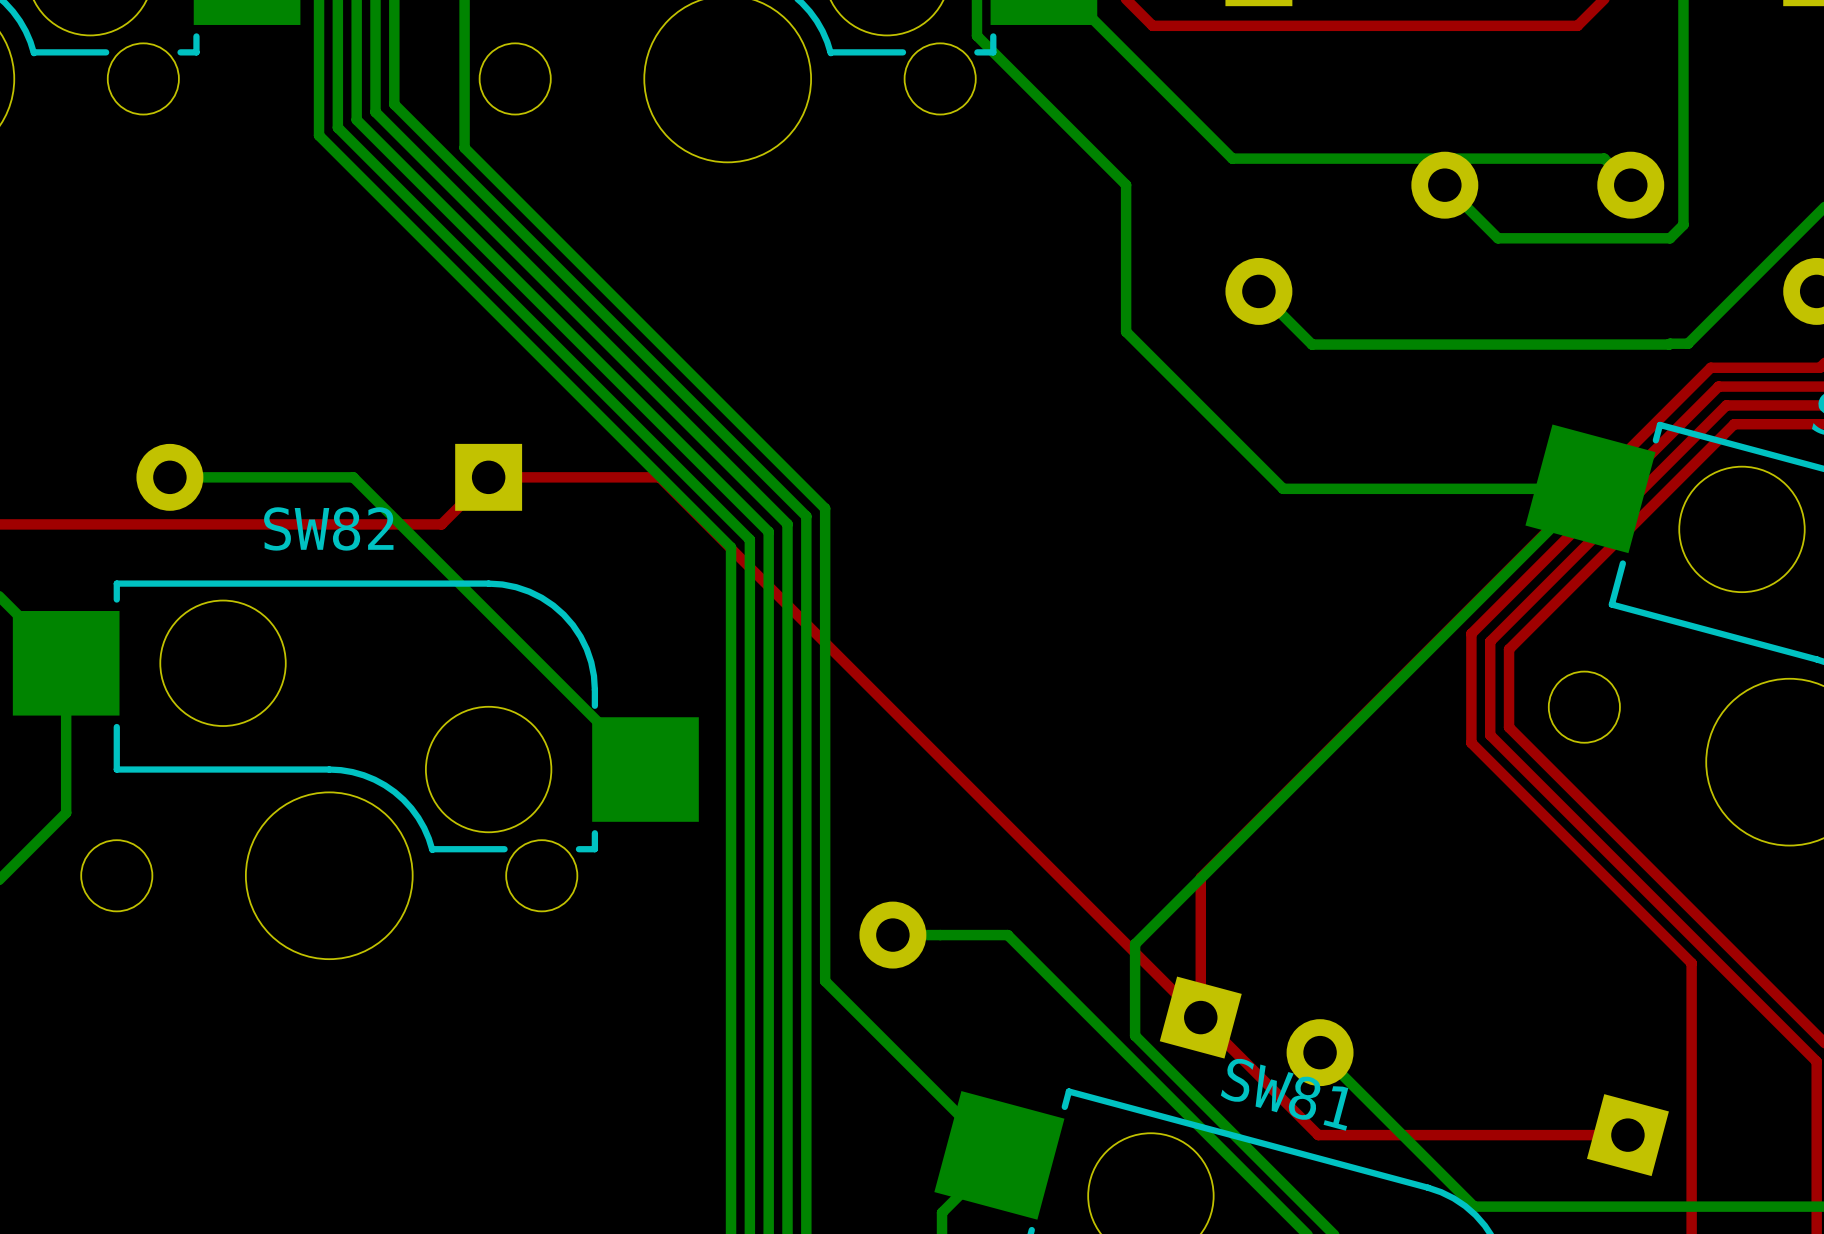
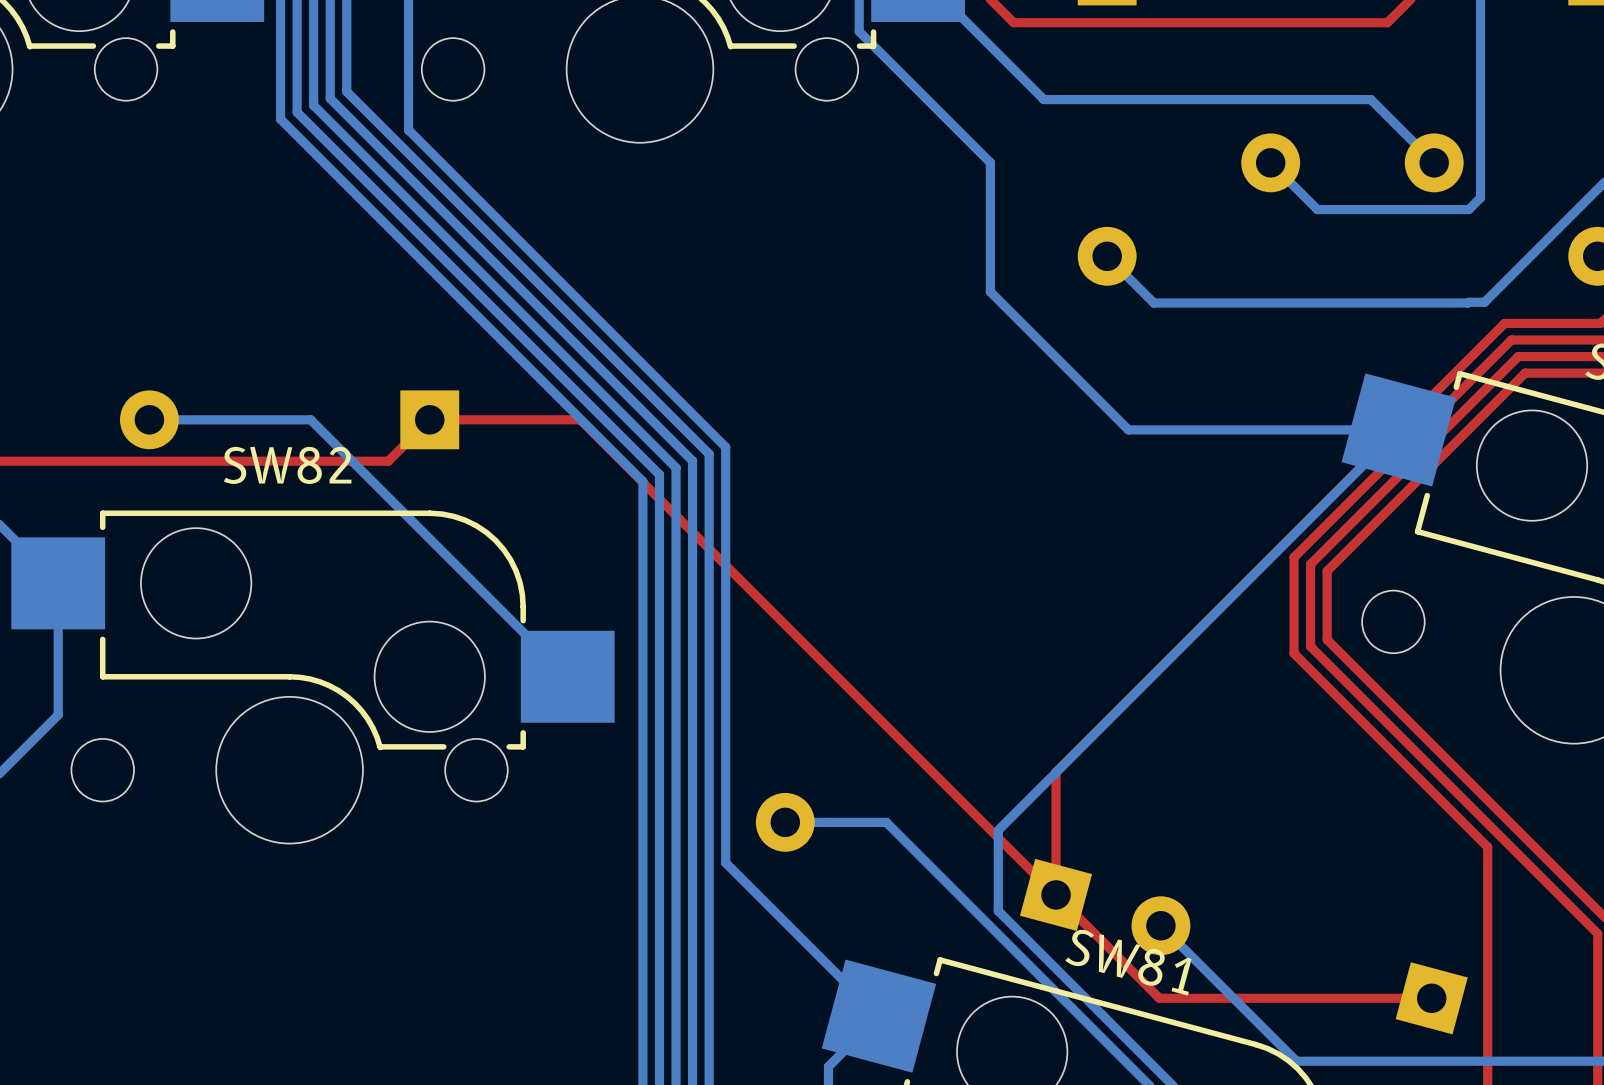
bottom track: (1186, 113) (1232, 158) (1604, 158) -> (1043, 99) (1370, 99) (1410, 139)

